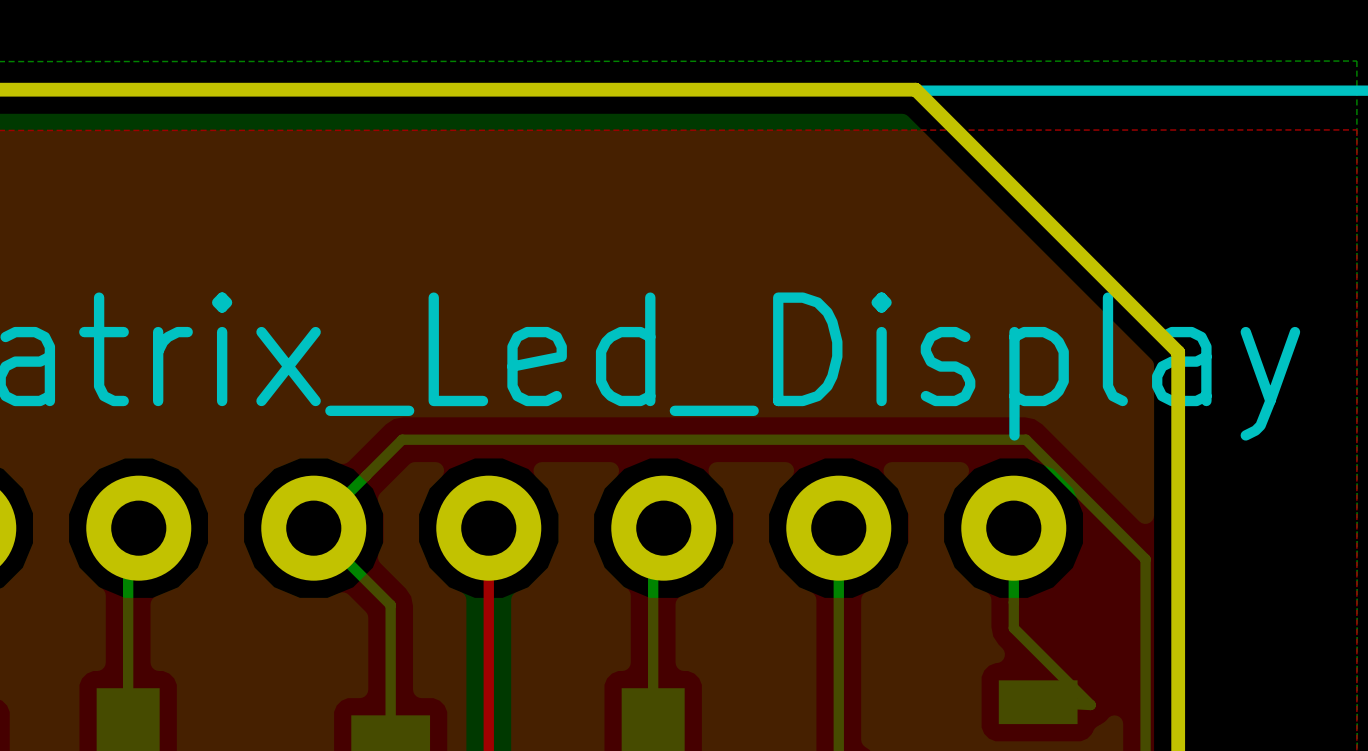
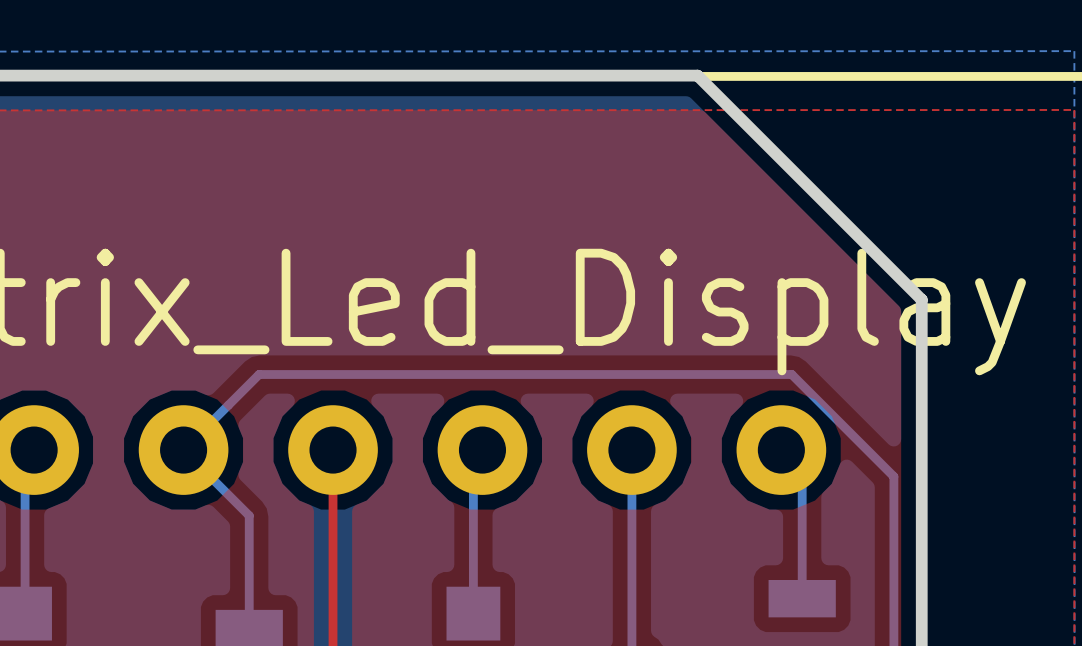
bottom track: (1013, 528) (1013, 628) (1090, 705) (1038, 702) -> (781, 450) (802, 470) (802, 598)

